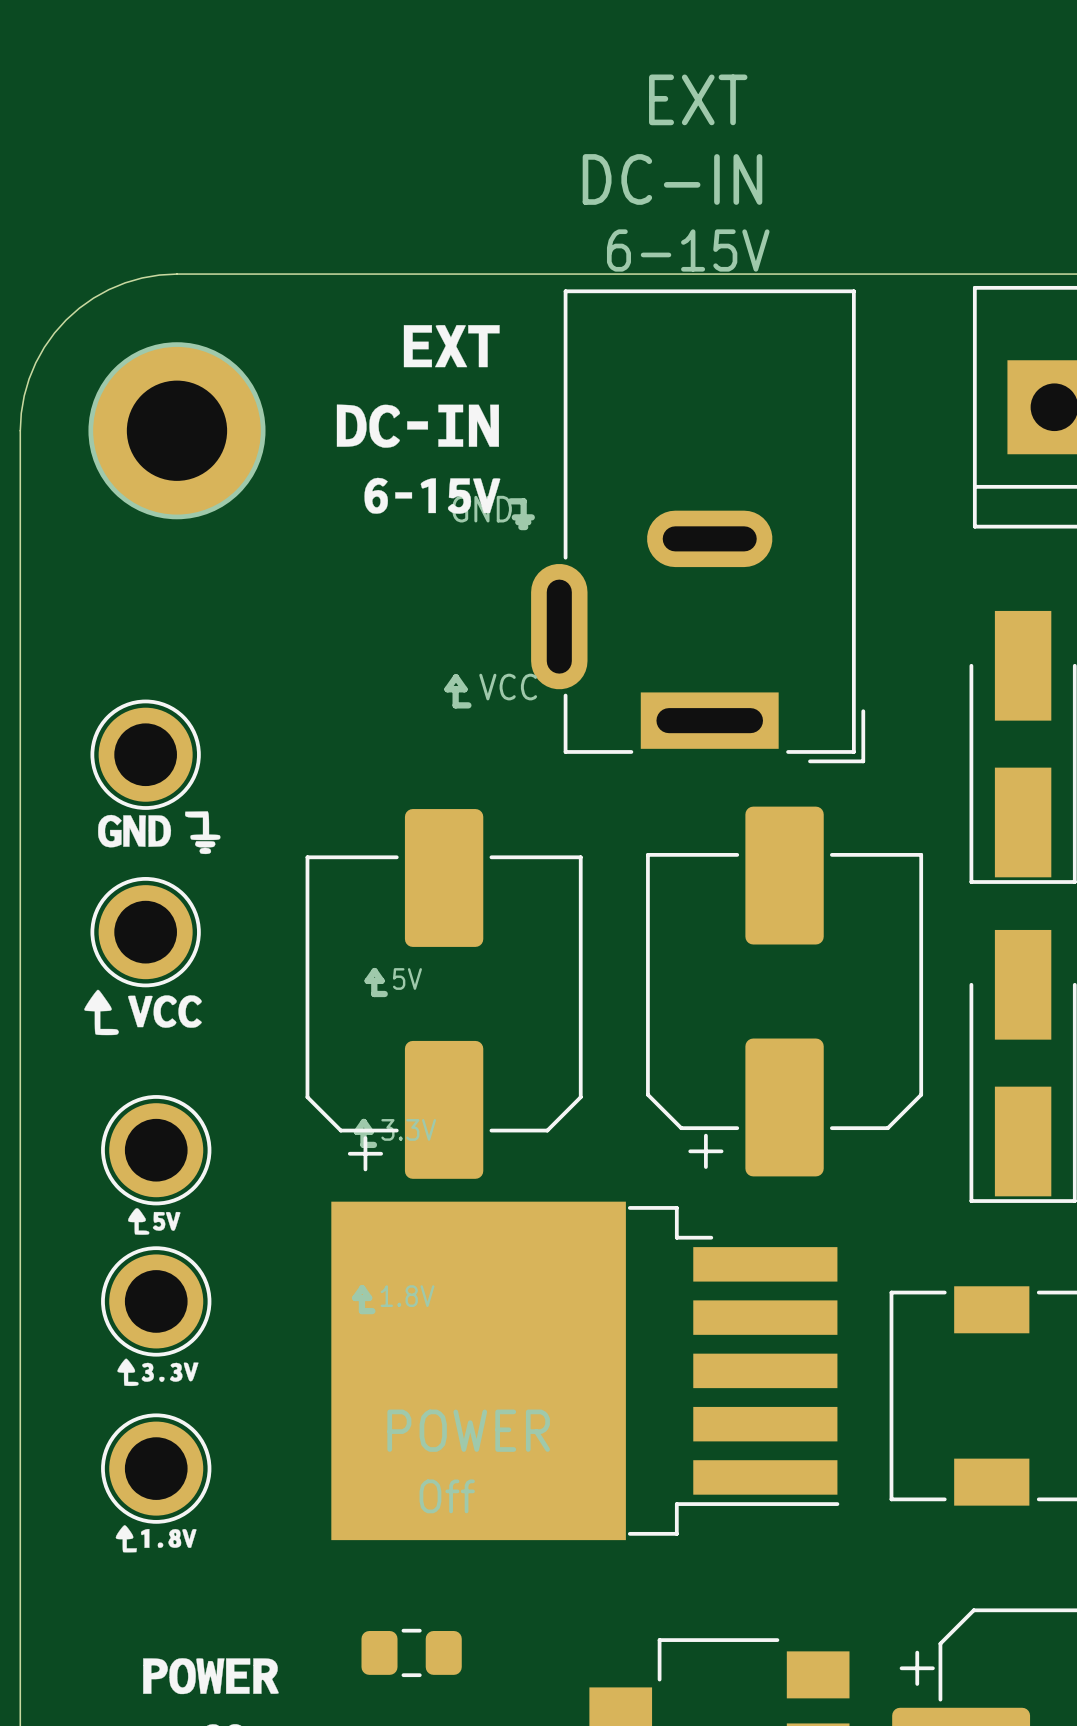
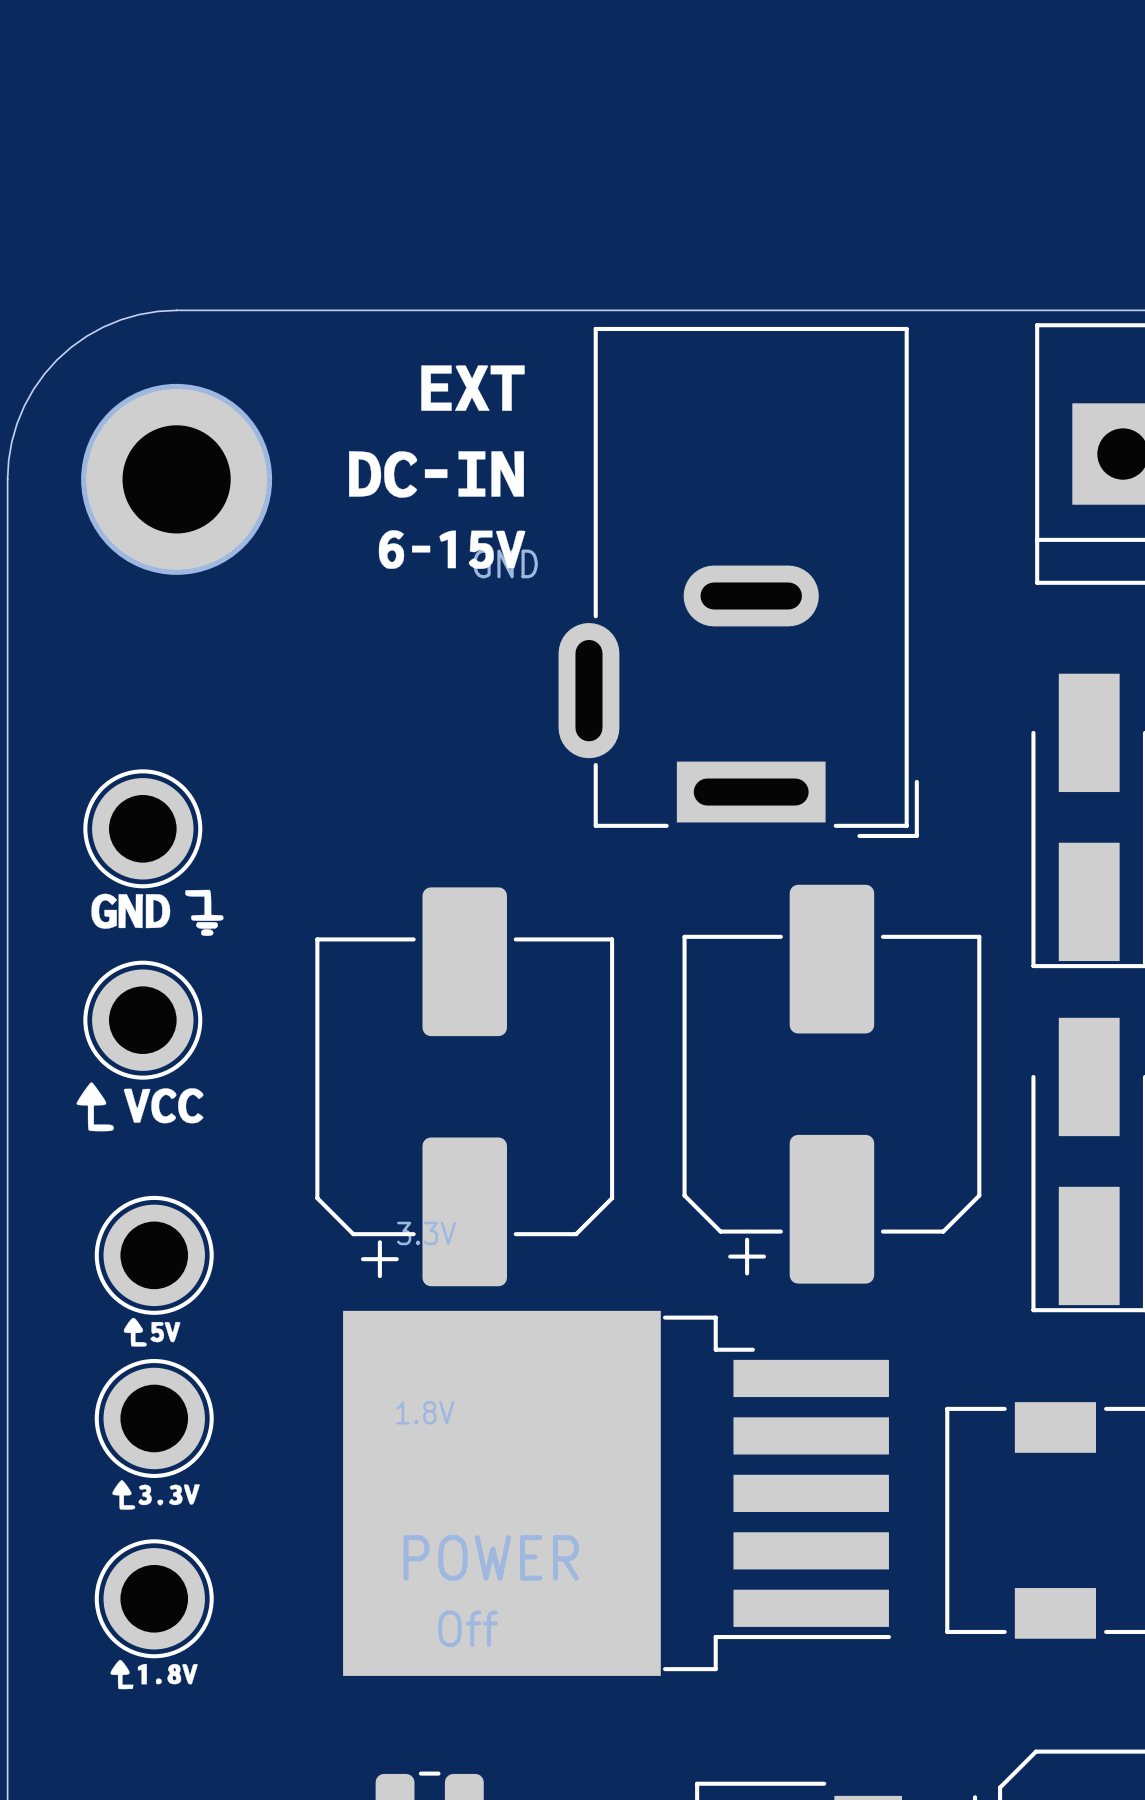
text: EXT (698, 99) -> none
text: DC-IN (672, 179) -> none
text: 6-15V (688, 250) -> none
line: (510, 501) (523, 501) (523, 516) -> none
line: (514, 517) (531, 517) -> none
line: (518, 522) (528, 522) -> none
line: (521, 527) (525, 527) -> none
line: (455, 677) (447, 689) (464, 689) (455, 677) -> none
text: VCC (508, 687) -> none
line: (455, 689) (455, 705) (468, 705) -> none
line: (374, 971) (381, 980) (367, 980) (374, 971) -> none
text: 5V (407, 979) -> none
line: (374, 980) (374, 993) (384, 993) -> none
line: (363, 1121) (370, 1131) (356, 1131) (363, 1121) -> none
line: (363, 1131) (363, 1144) (373, 1144) -> none
line: (362, 1288) (355, 1297) (369, 1297) (362, 1288) -> none
line: (361, 1297) (361, 1311) (372, 1311) -> none

